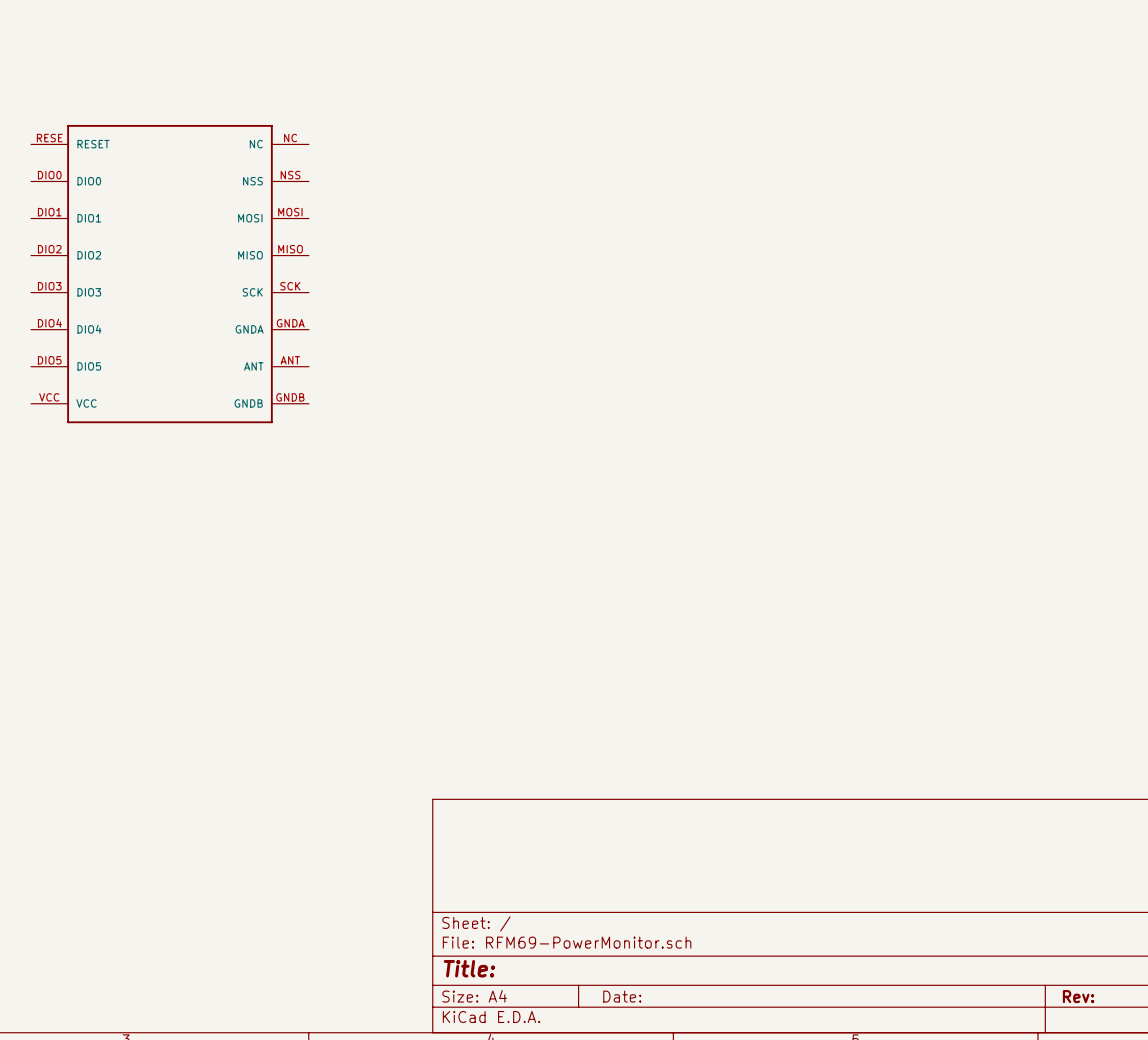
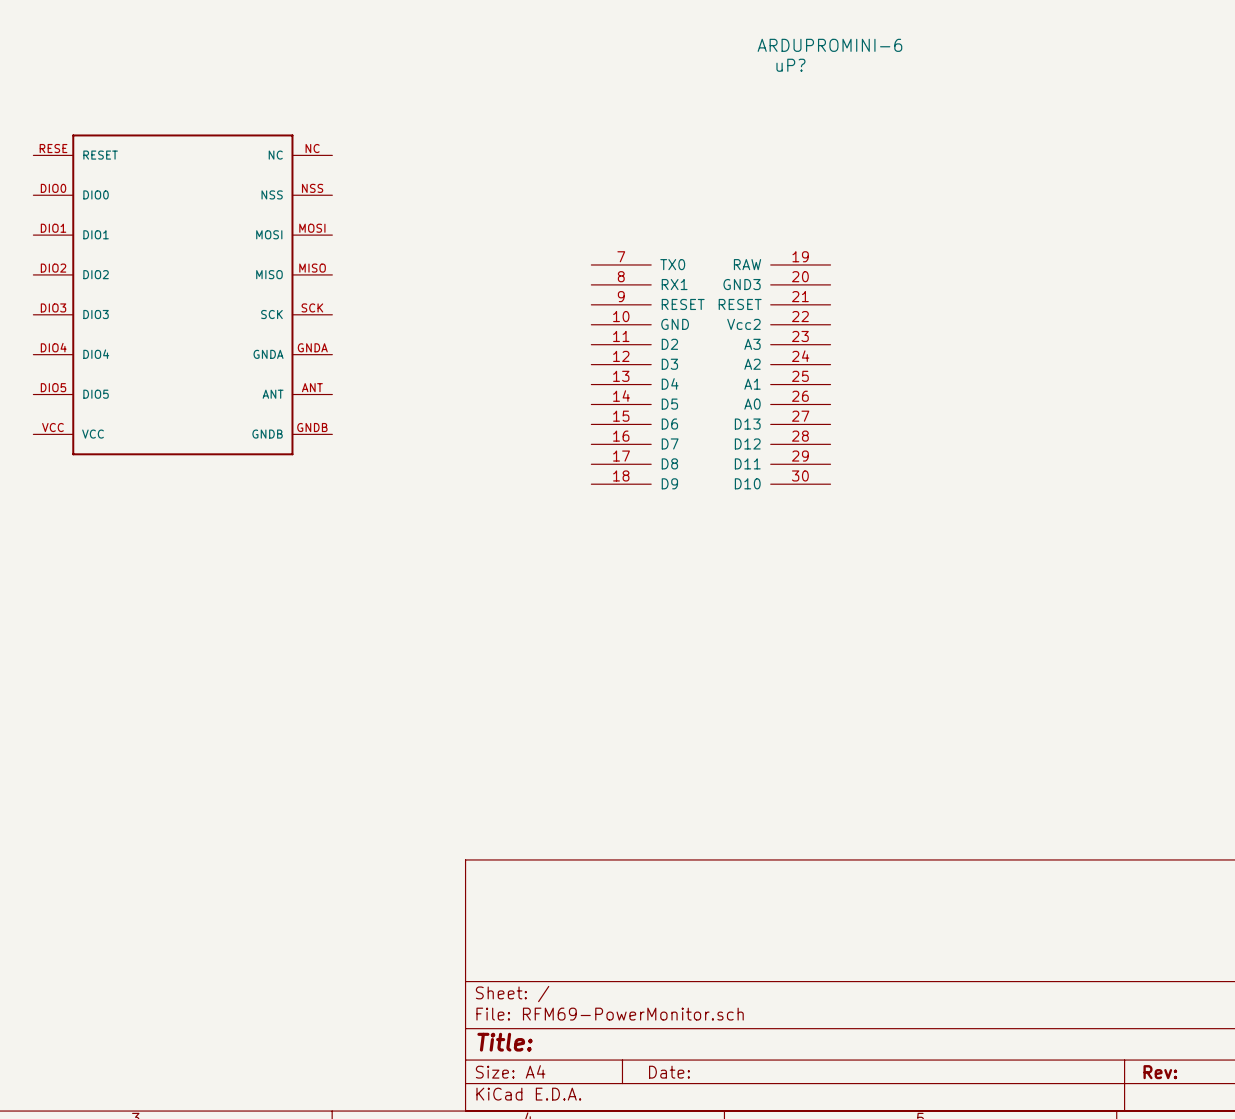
uP?: none -> ARDUPROMINI-6 (710, 374)

